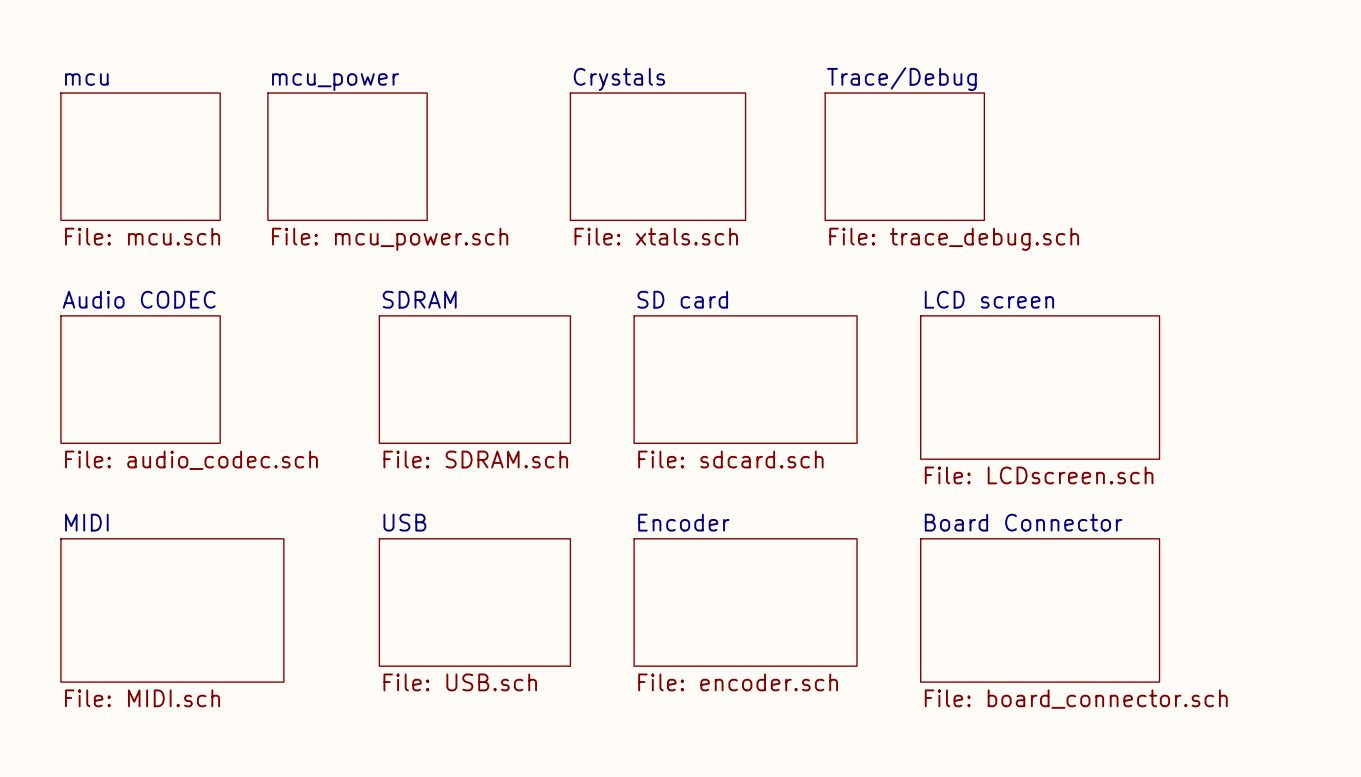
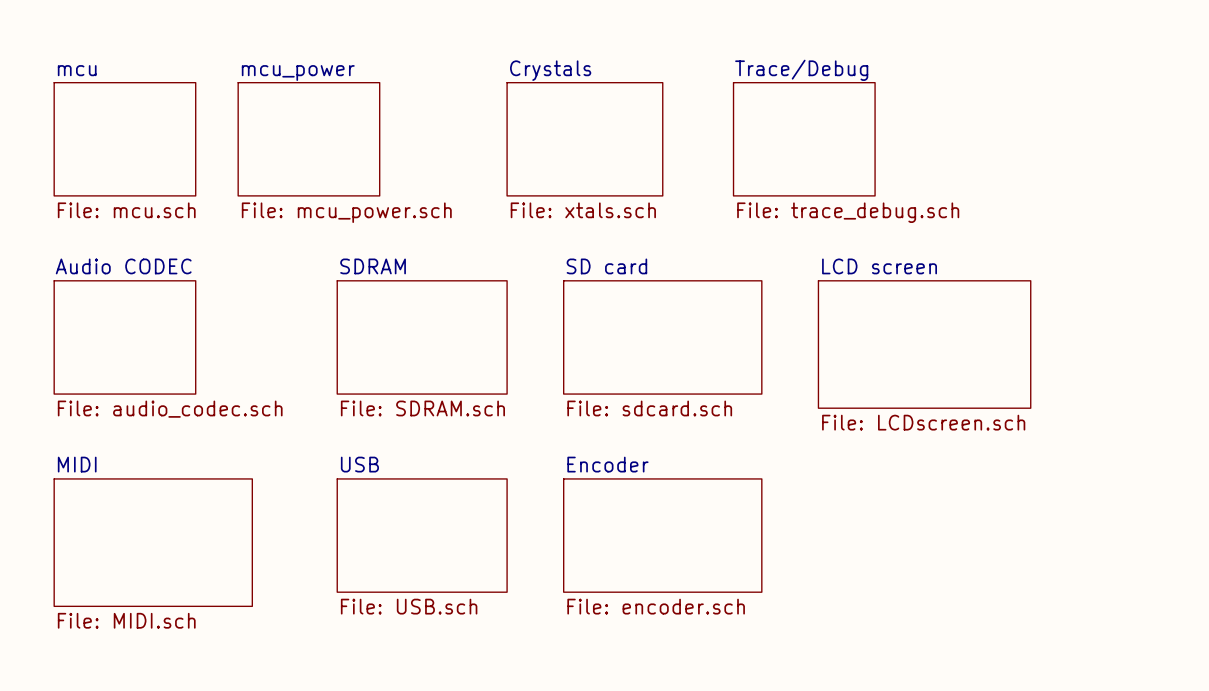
sheet Board Connector: File: board_connector.sch (1040, 610) -> none

